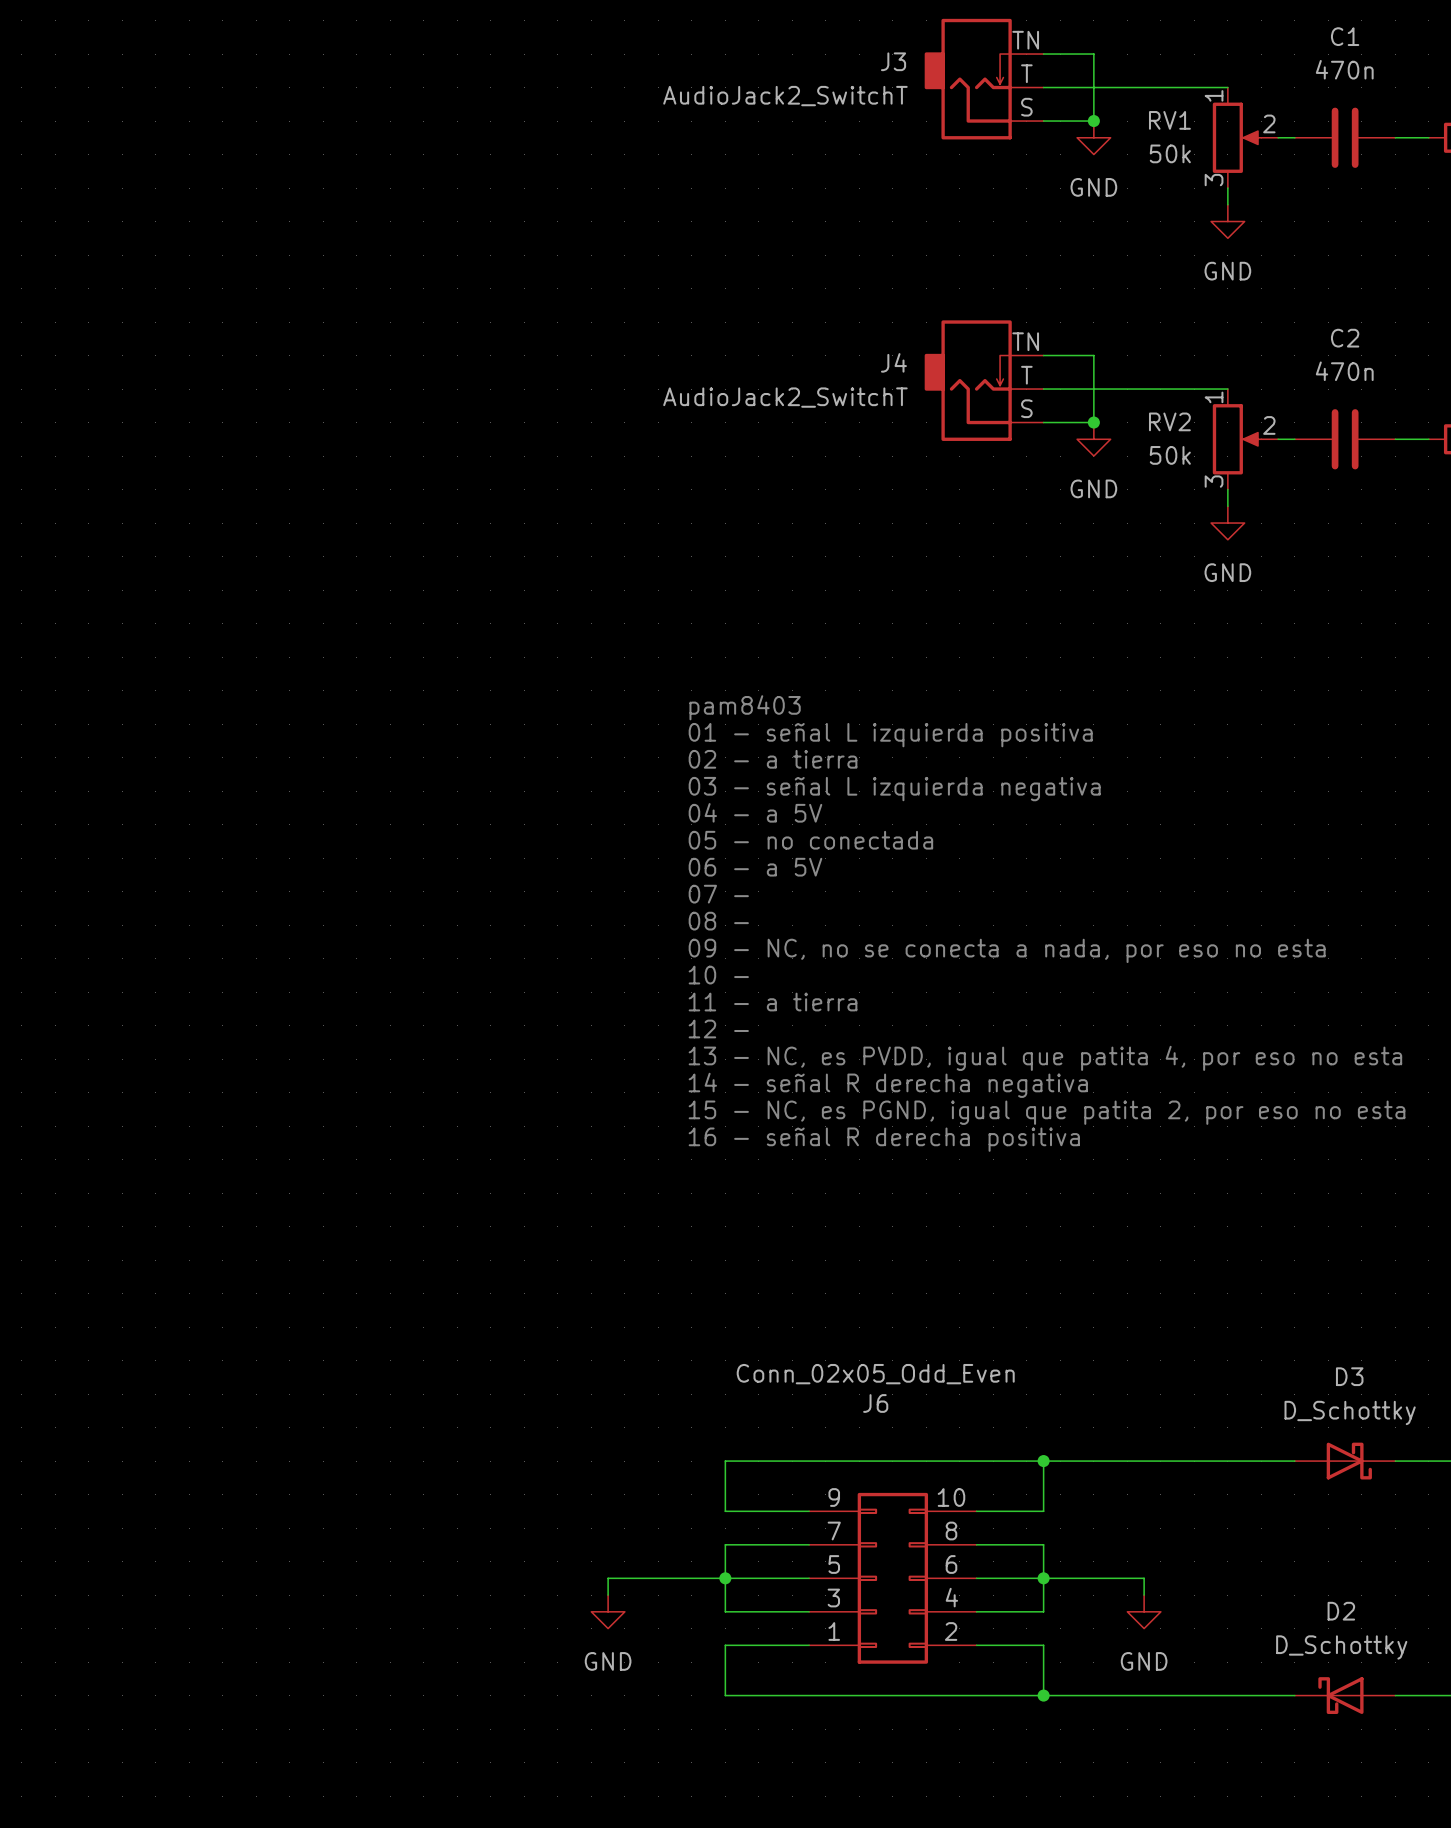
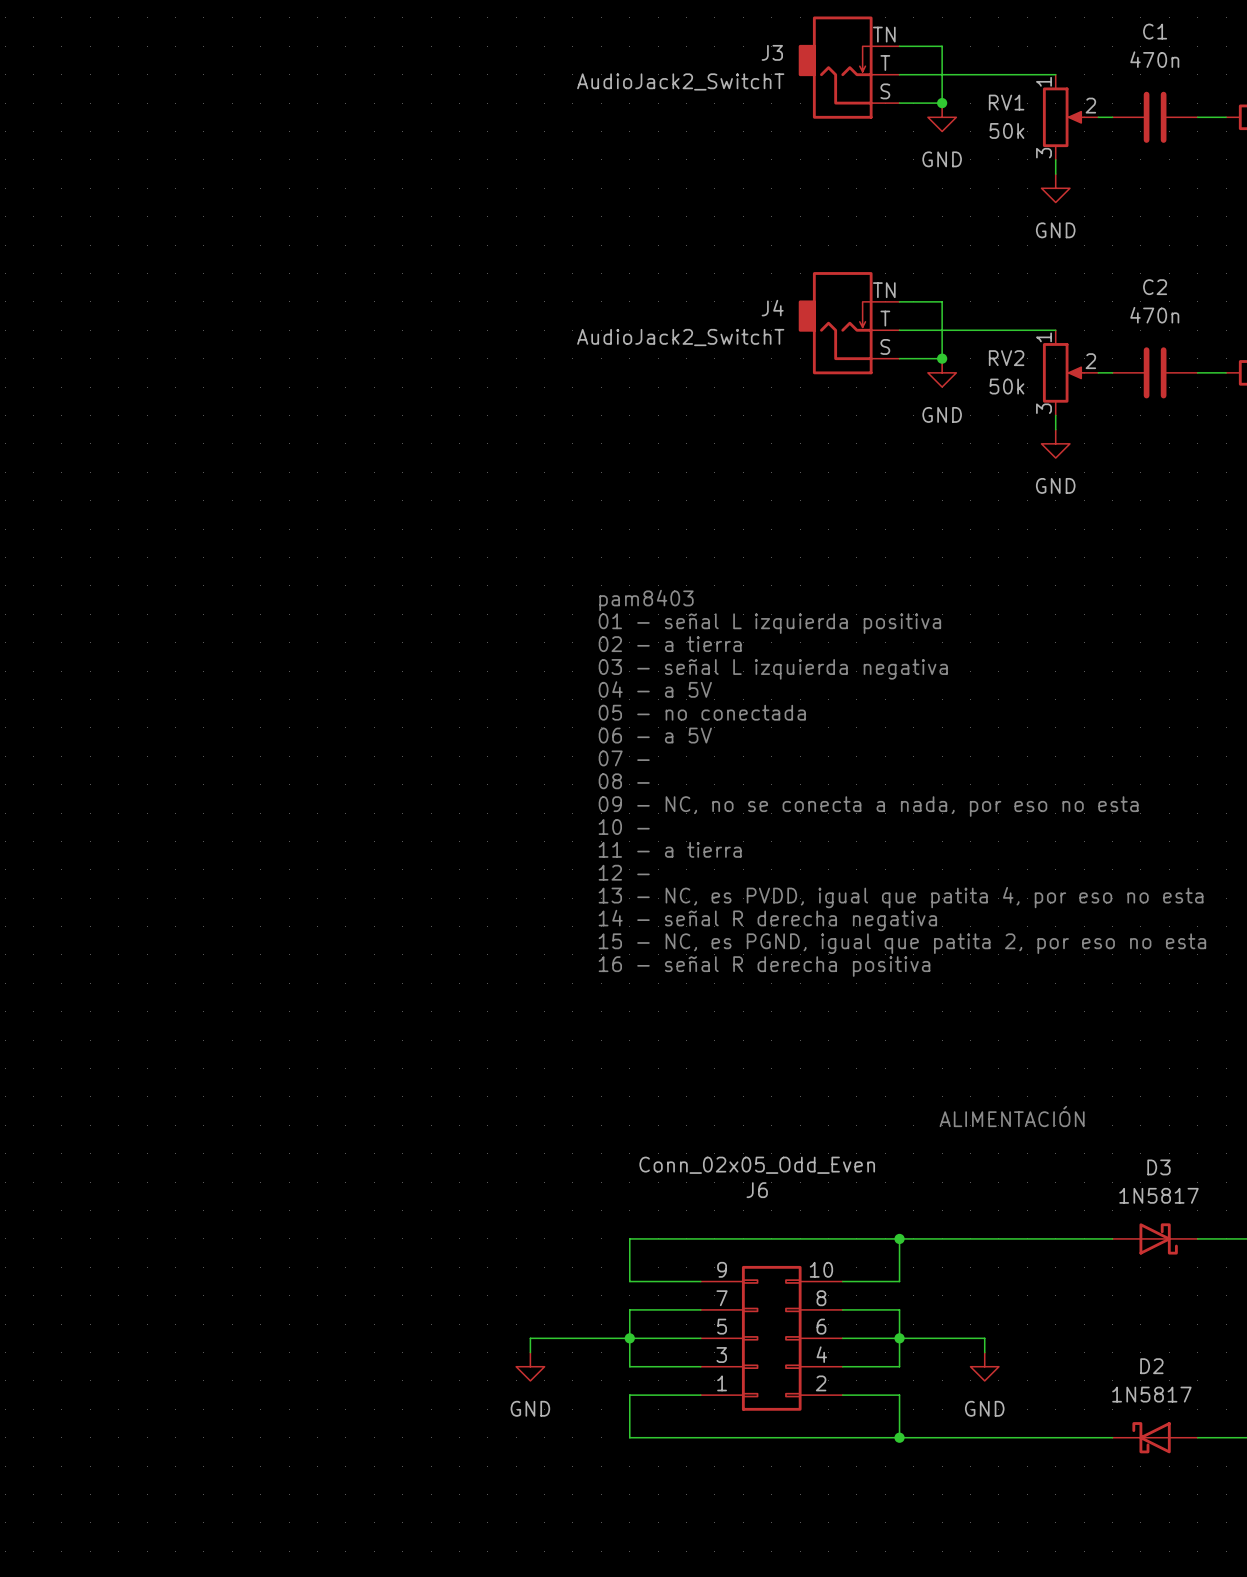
text: none -> ALIMENTACIÓN (1012, 1116)
D3 value: D_Schottky (1350, 1412) -> 1N5817 (1158, 1195)
D2 value: D_Schottky (1341, 1647) -> 1N5817 (1151, 1394)

